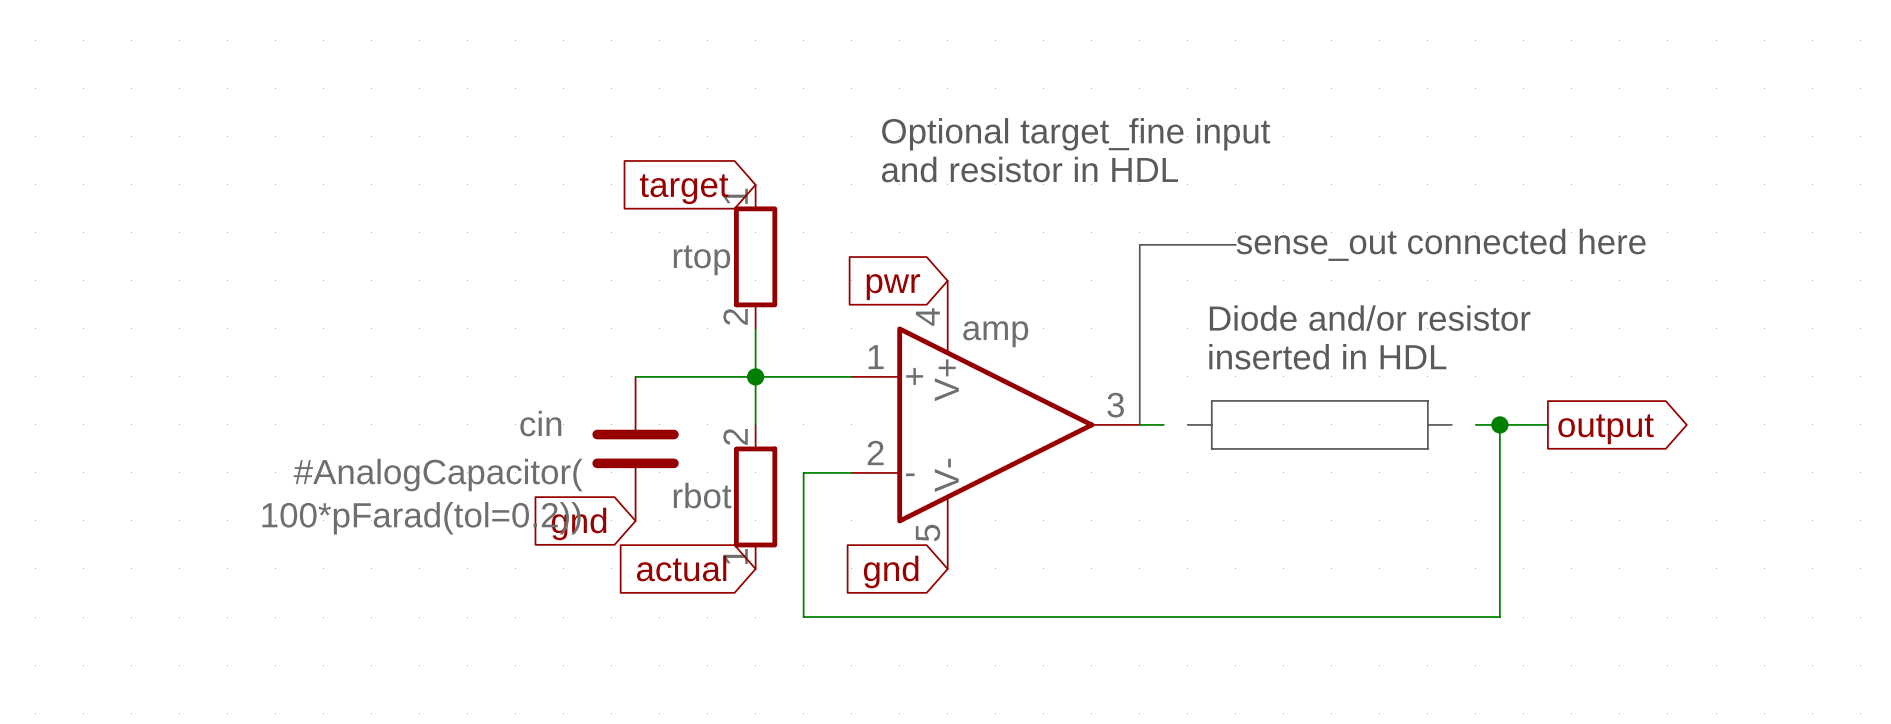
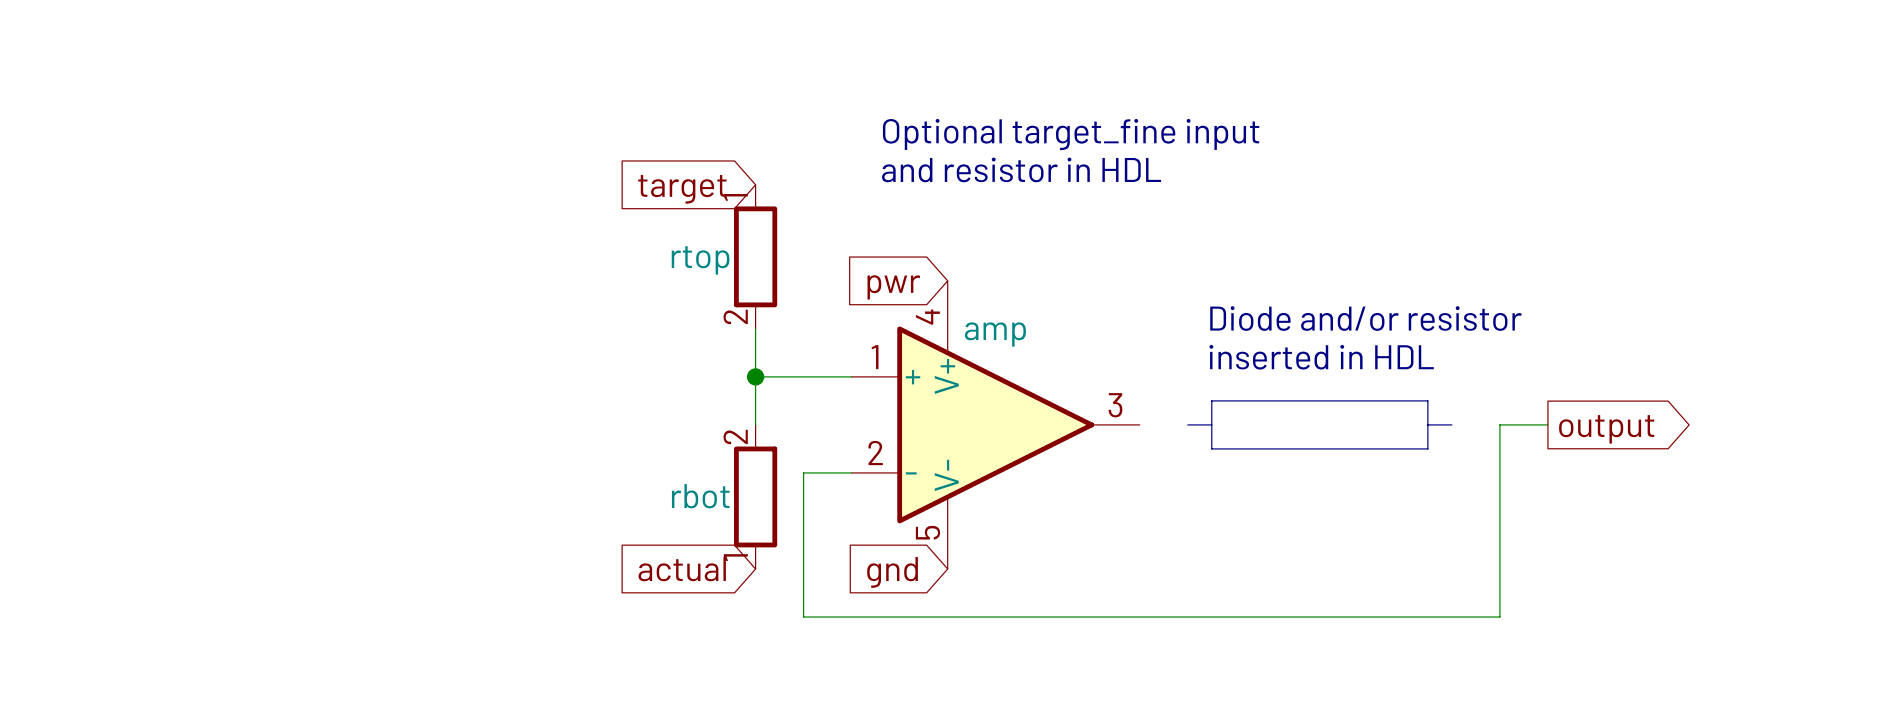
line: (1235, 244) (1139, 244) (1139, 424) -> none
text: sense_out connected here (1441, 244) -> none
wire: (635, 376) (755, 376) -> none
wire: (1139, 424) (1163, 424) -> none
wire: (1475, 424) (1499, 424) -> none
junction: (1499, 424) -> none
cin: #AnalogCapacitor( (635, 448) -> none
global label: gnd (579, 523) -> none

